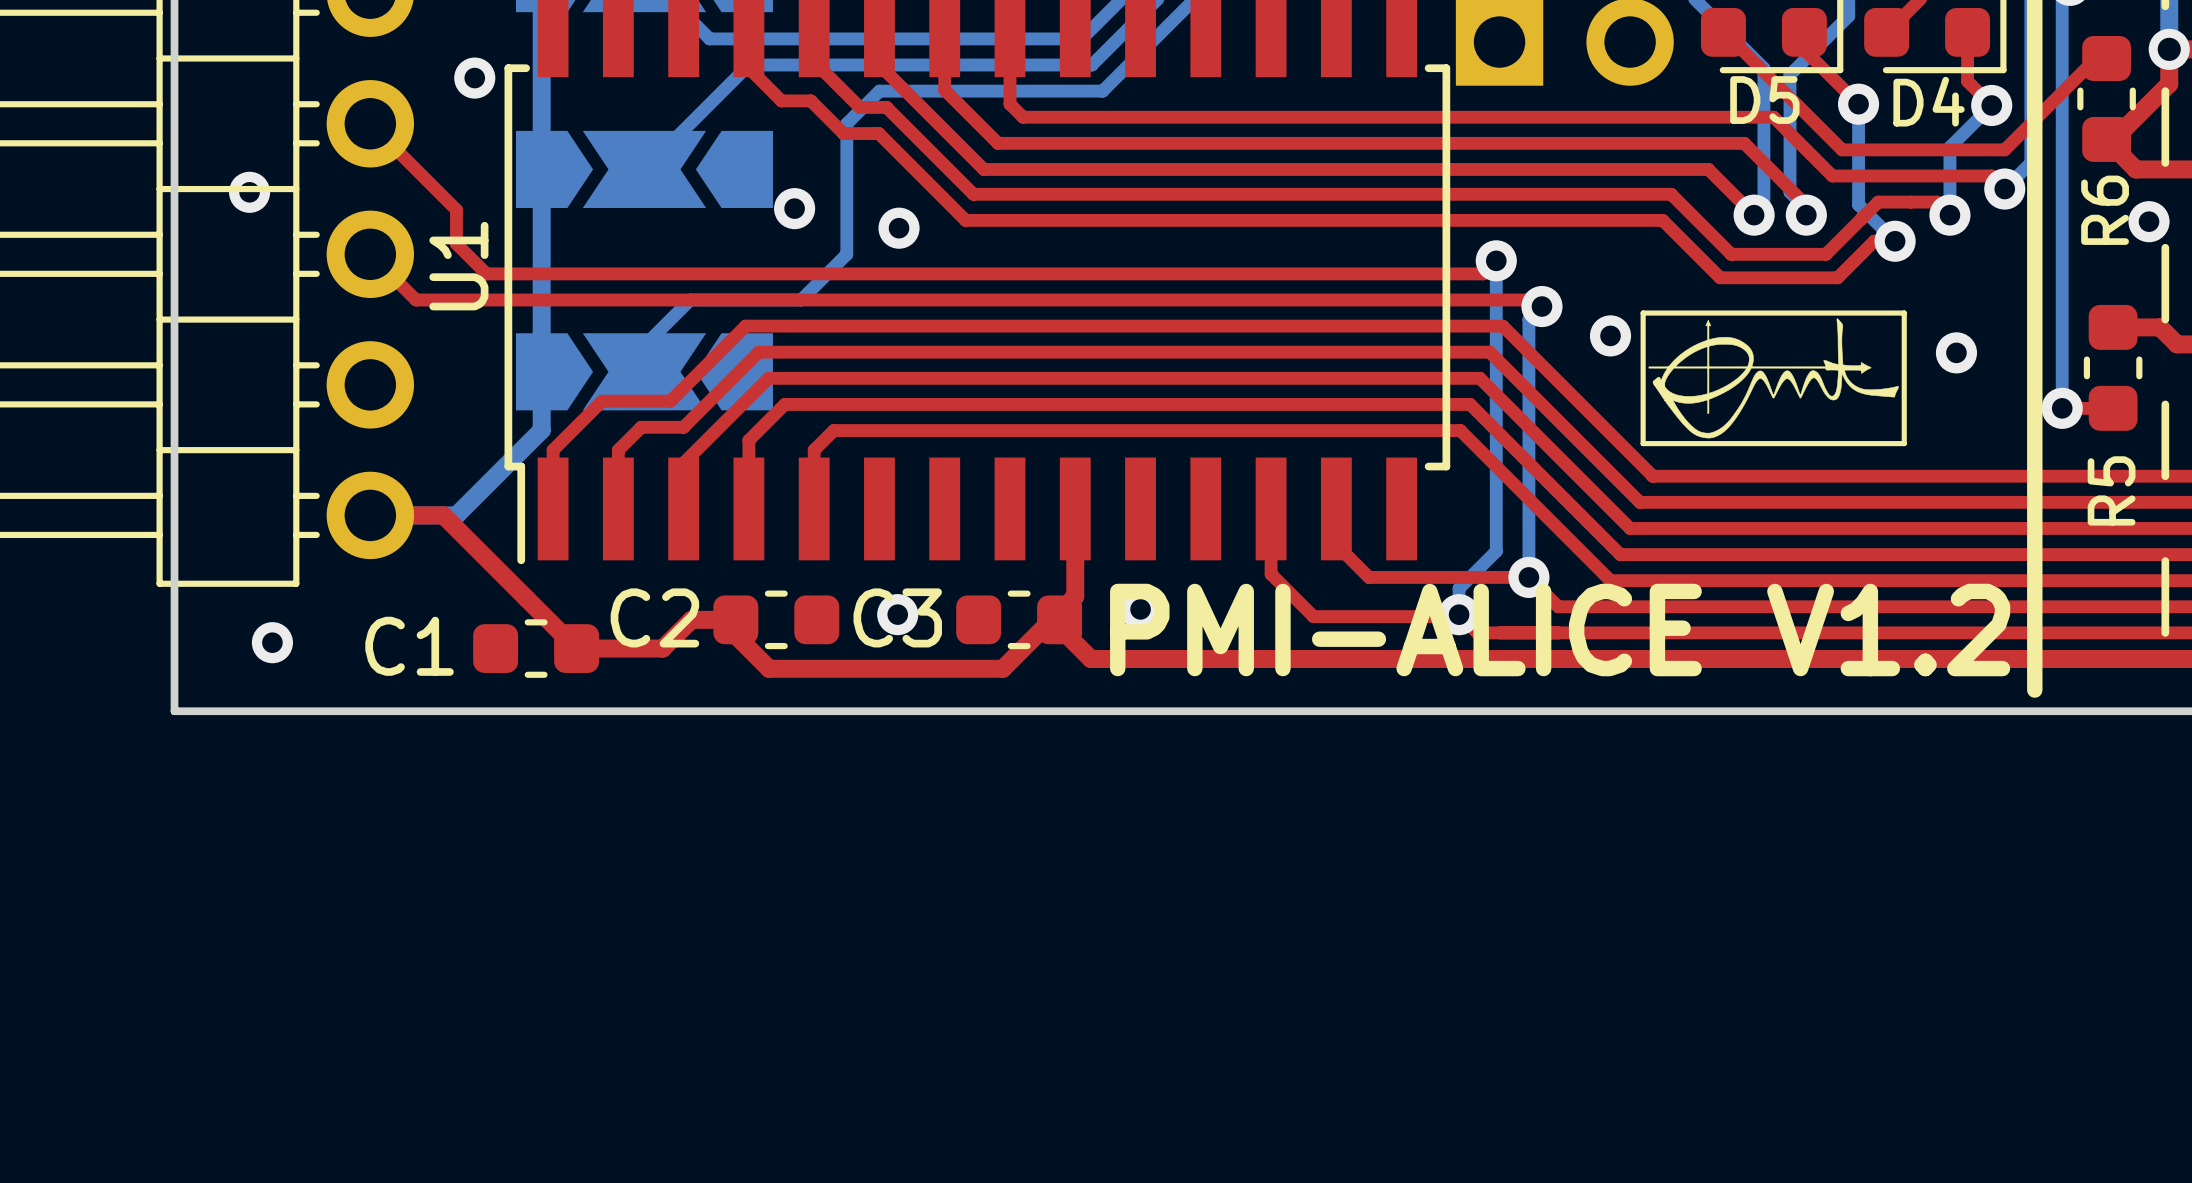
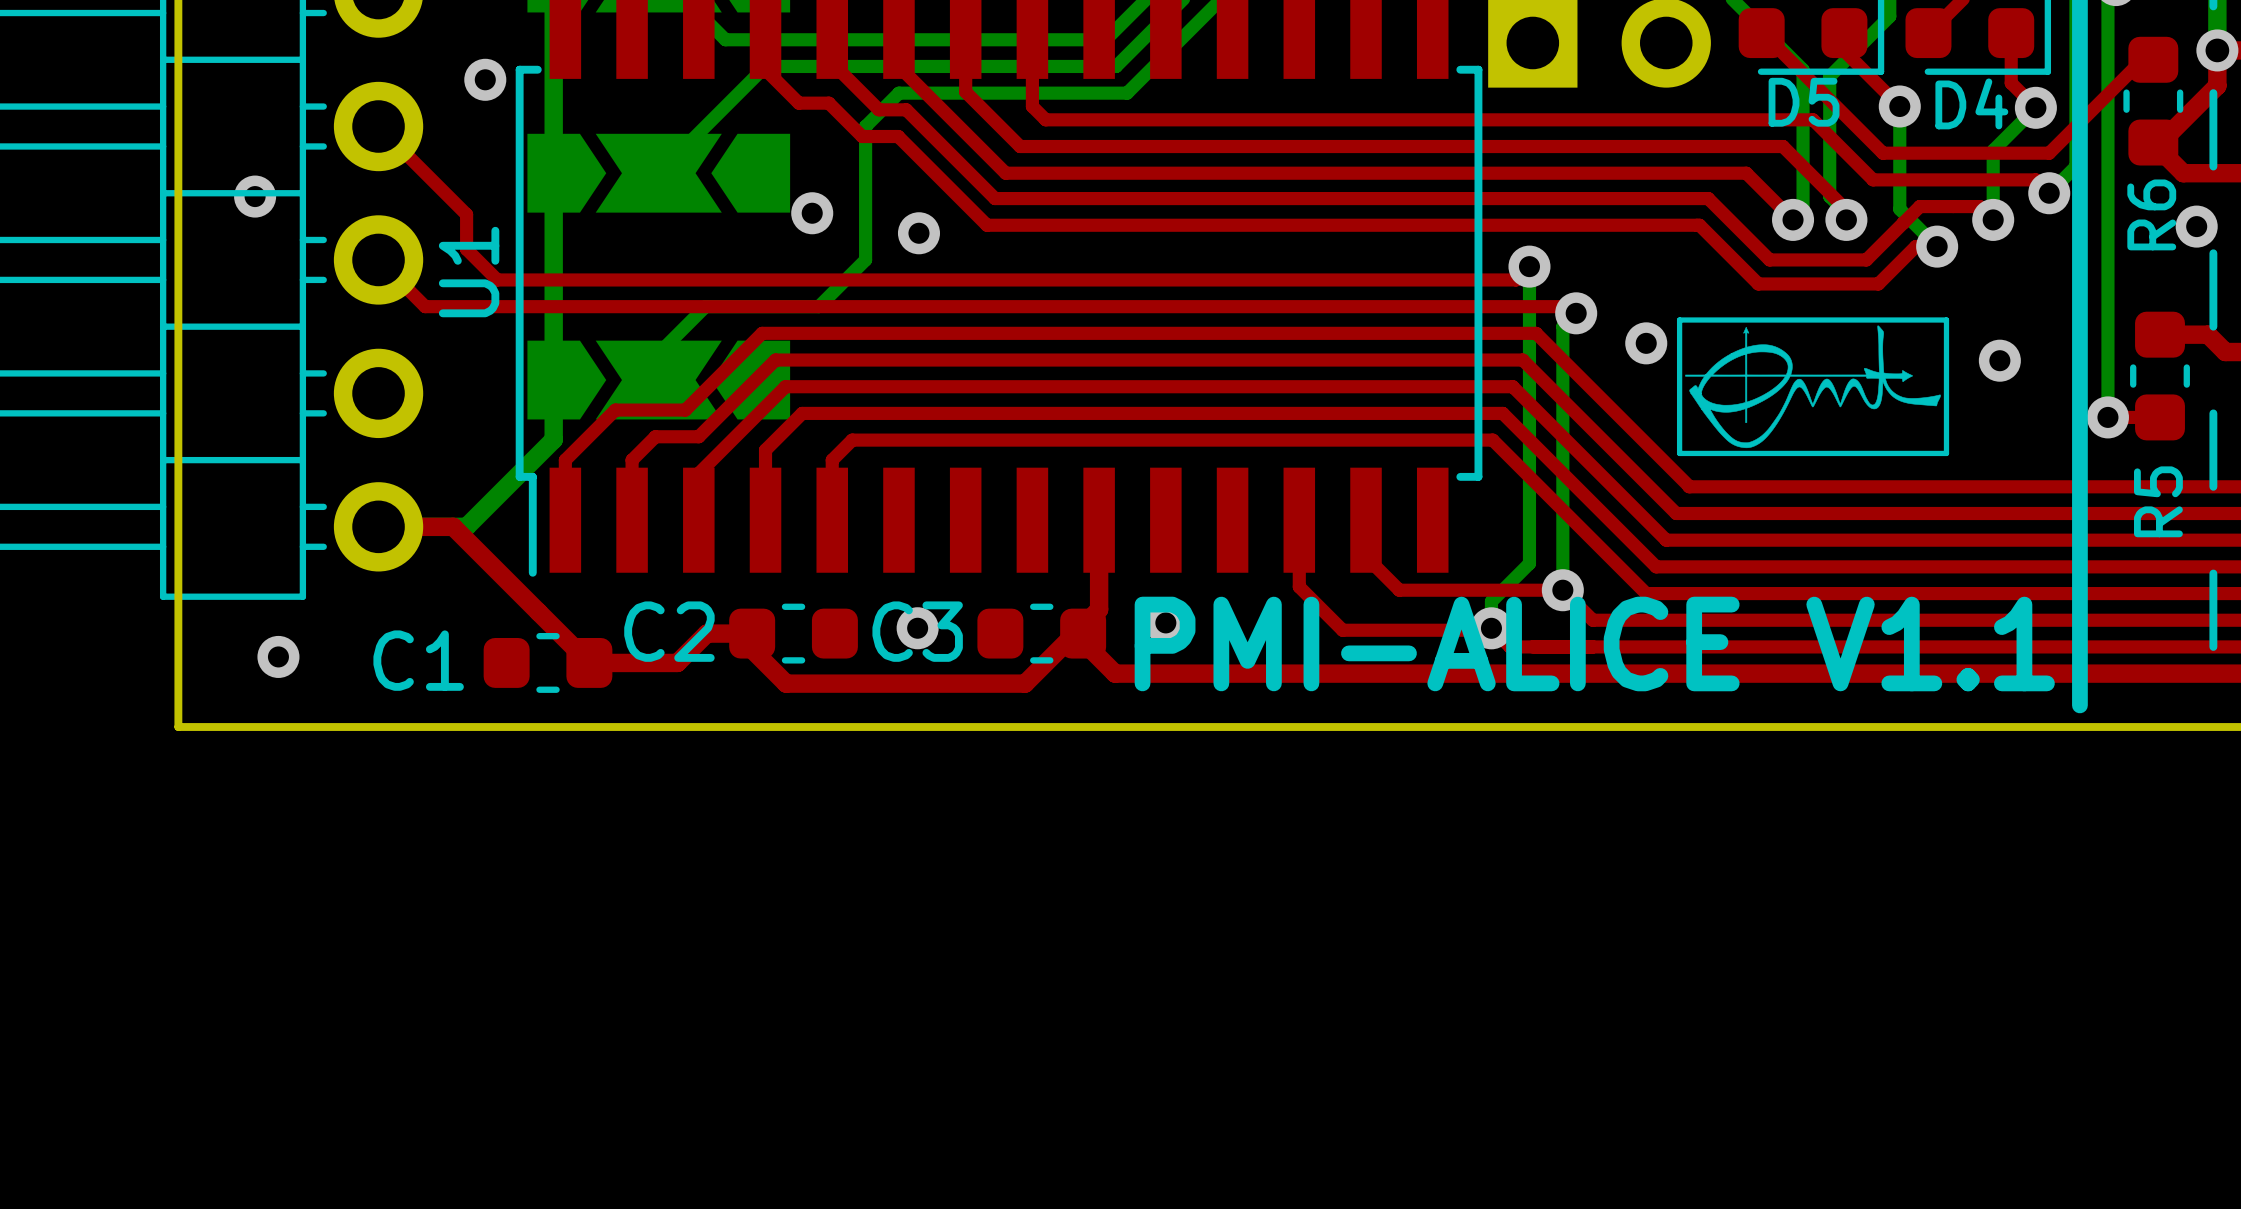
text: PMI-ALICE V1.2 (1560, 630) -> PMI-ALICE V1.1 (1594, 643)

